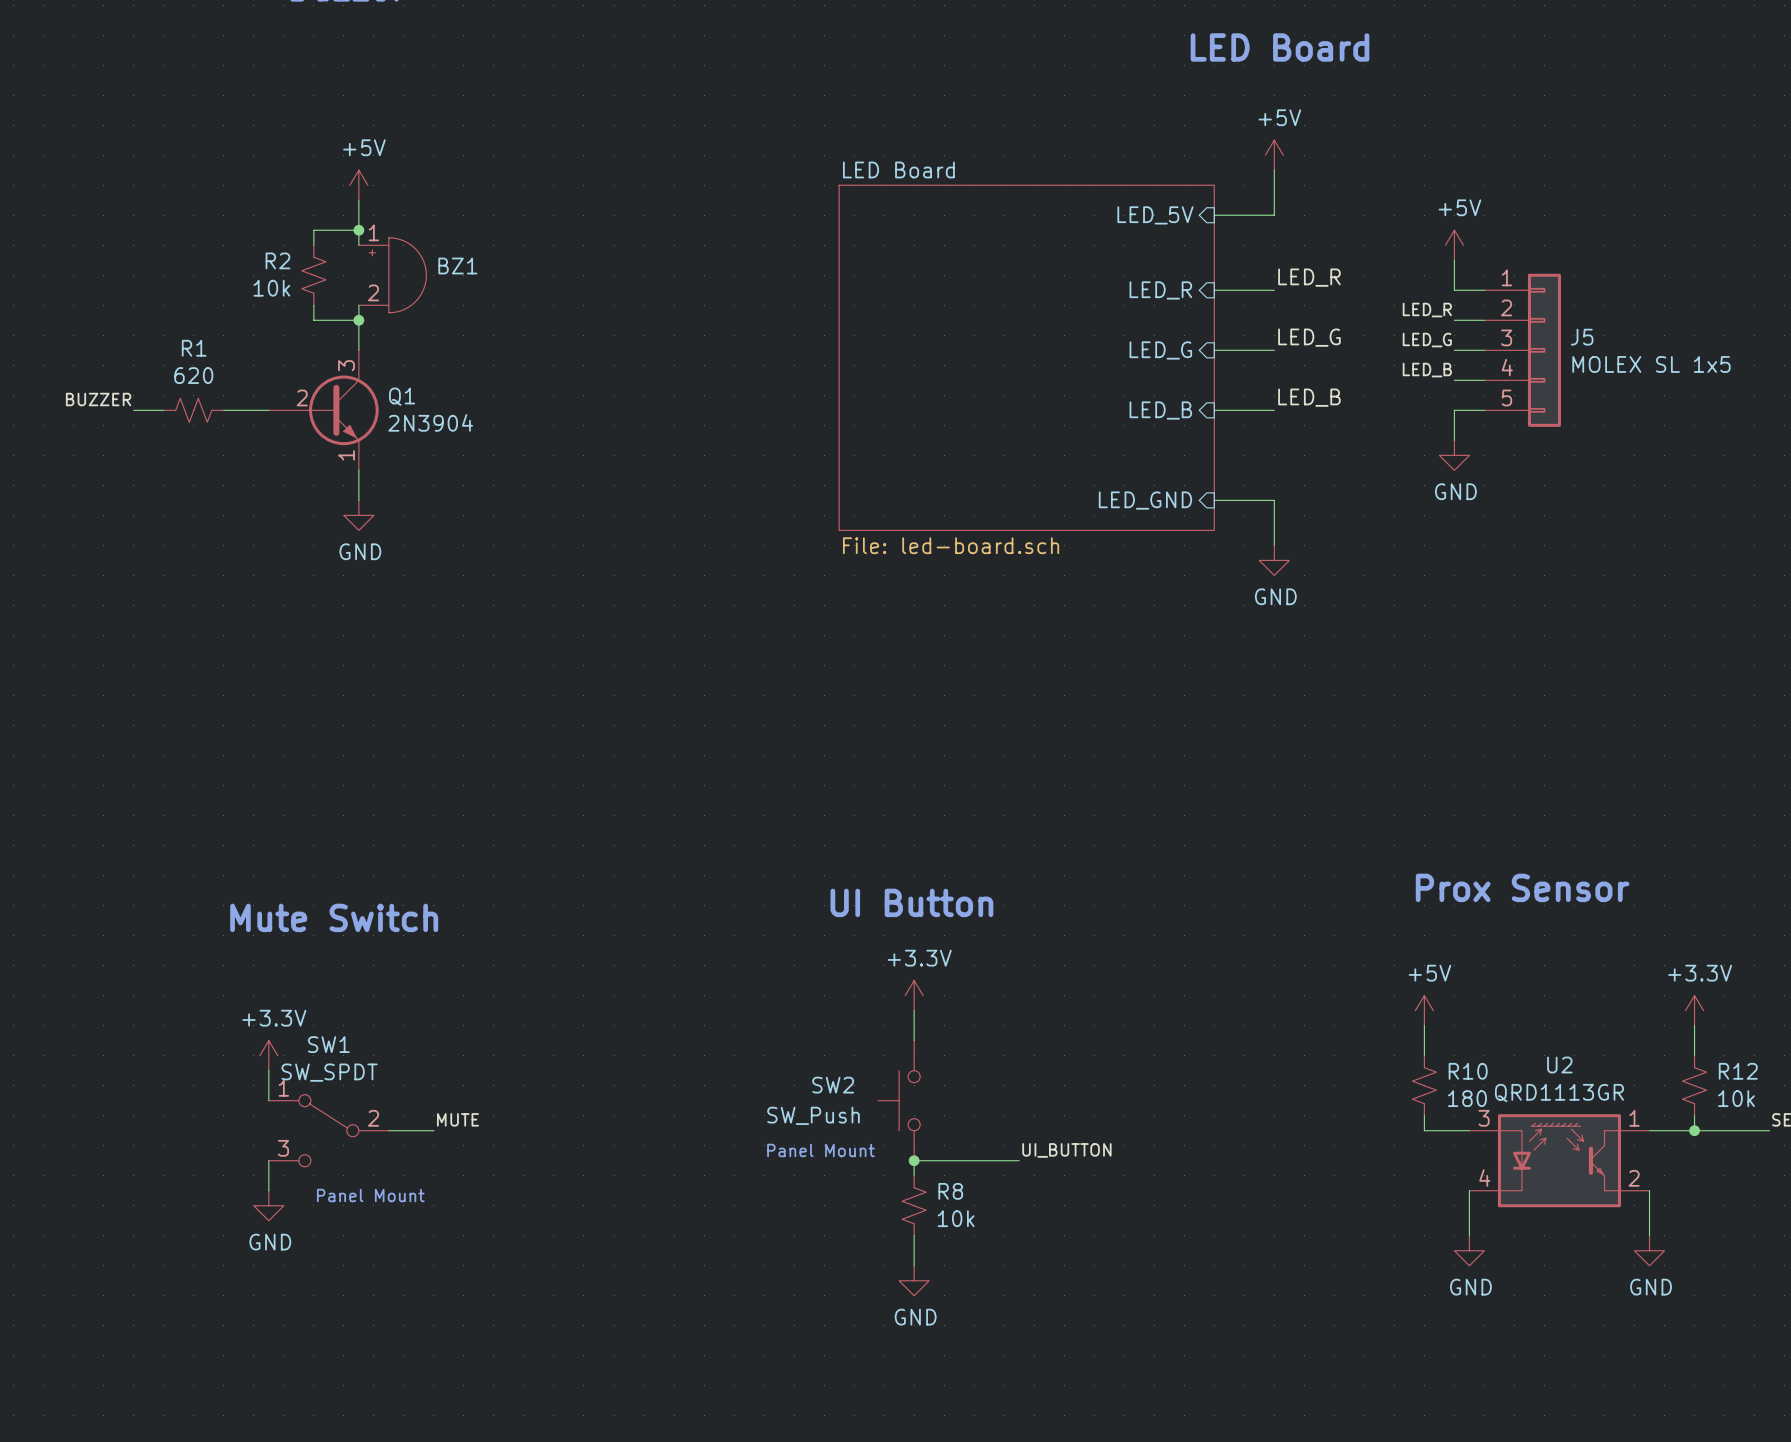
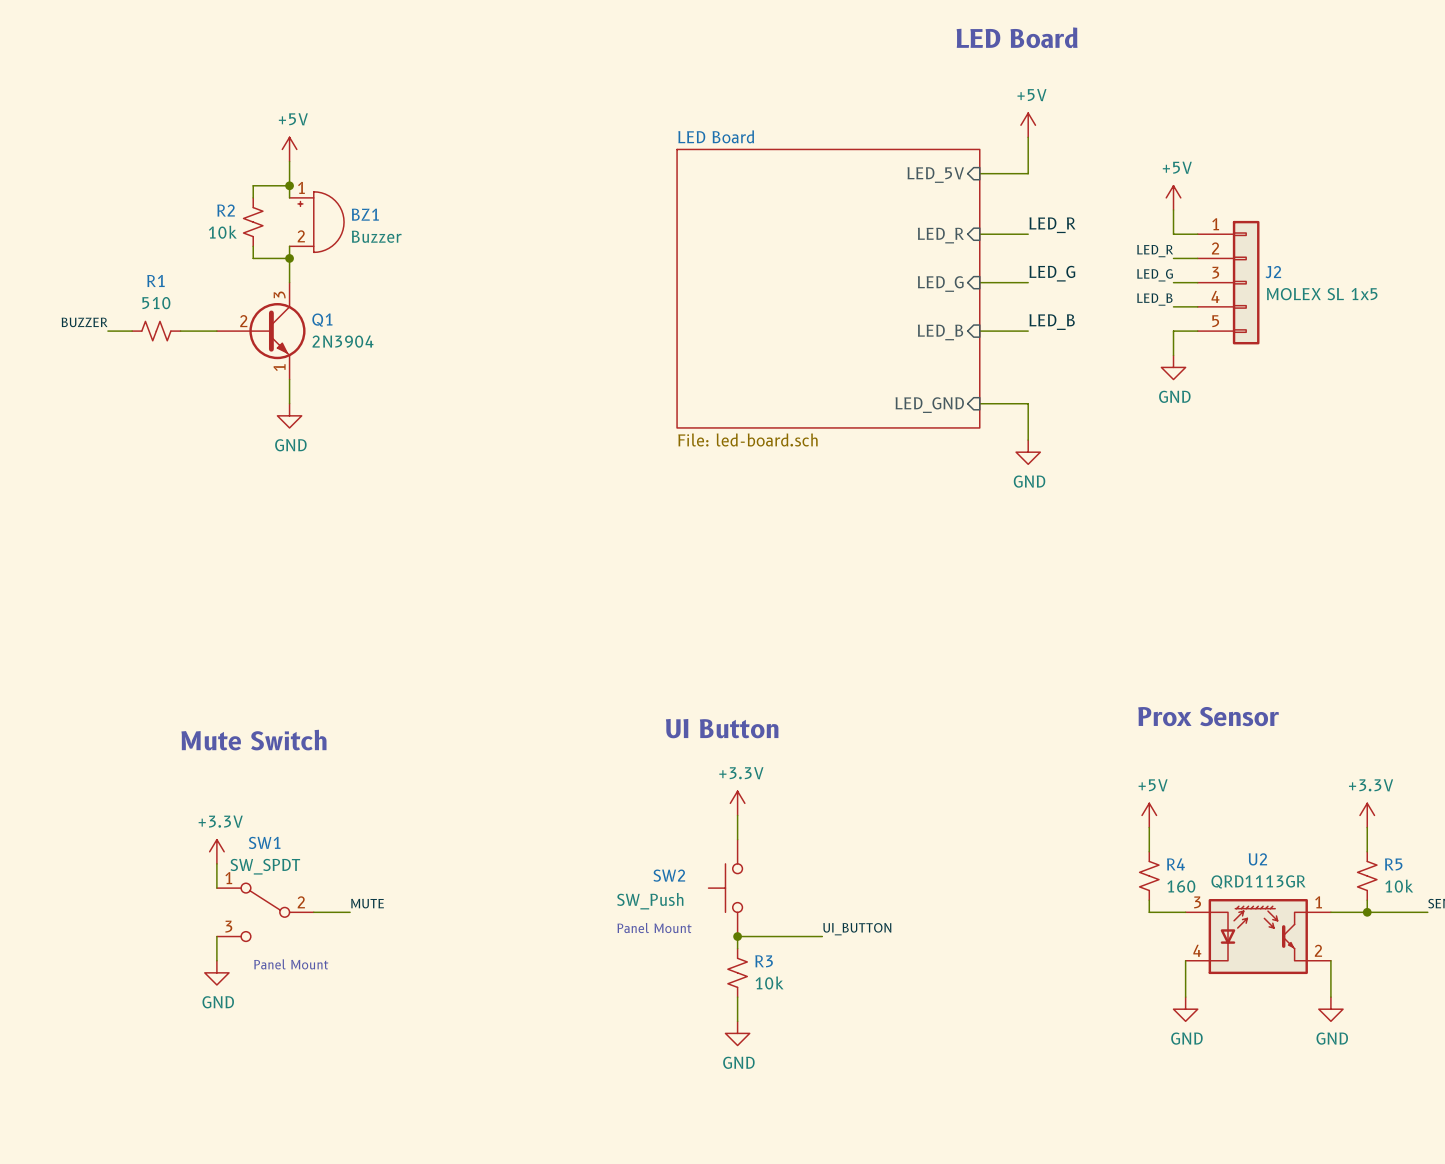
BZ1 value: none -> Buzzer (376, 236)
J5 name: J5 (1582, 337) -> J2 (1273, 272)
R1 value: 620 (193, 375) -> 510 (156, 303)
R10 name: R10 (1468, 1071) -> R4 (1175, 864)
R12 name: R12 (1738, 1071) -> R5 (1393, 864)
R10 value: 180 (1467, 1098) -> 160 (1181, 886)
R8 name: R8 (950, 1191) -> R3 (764, 961)

